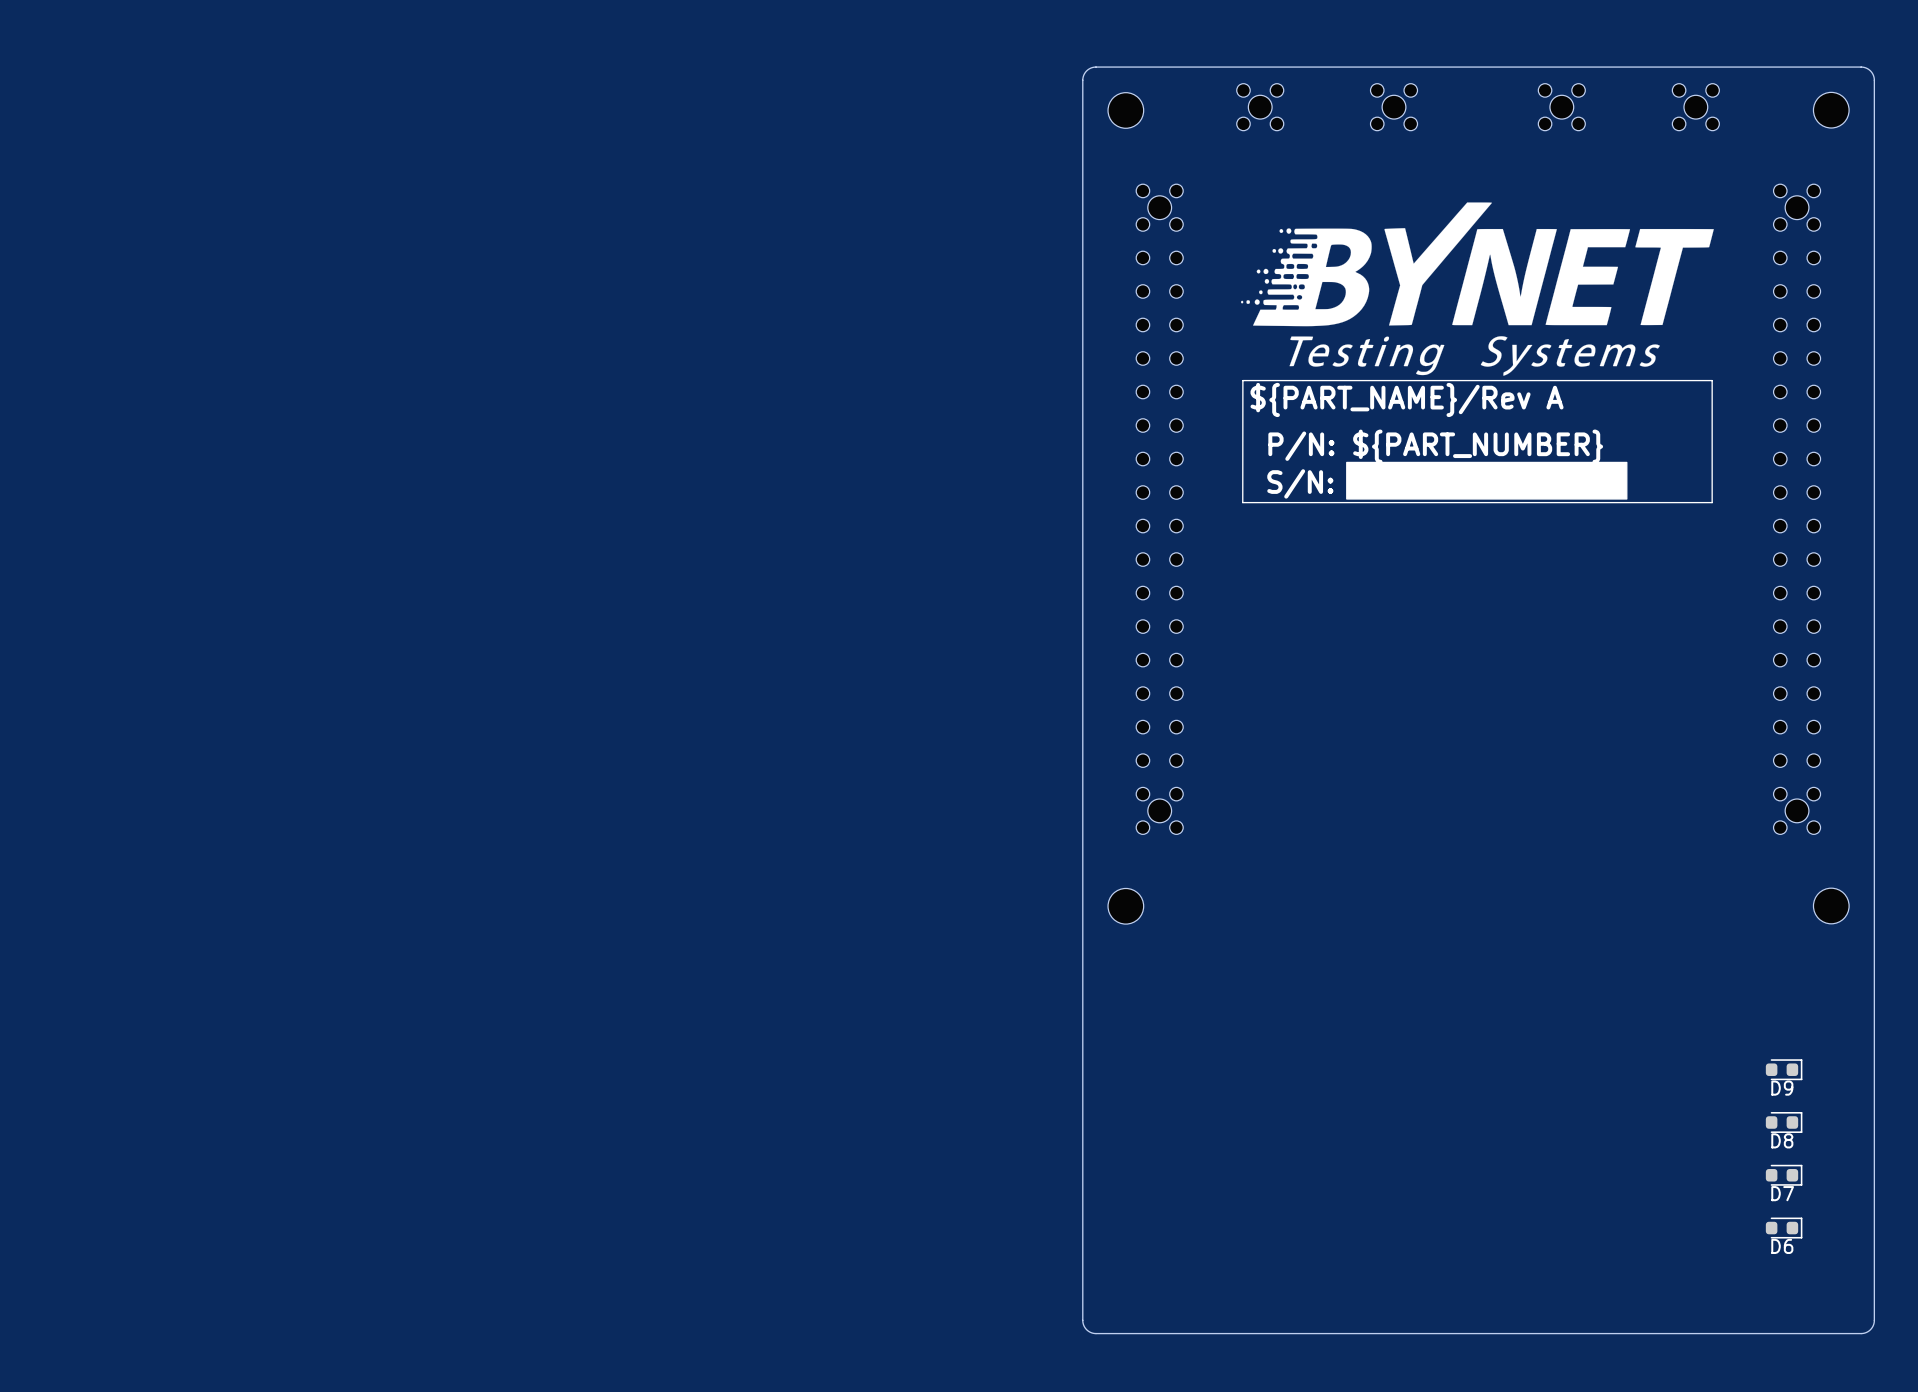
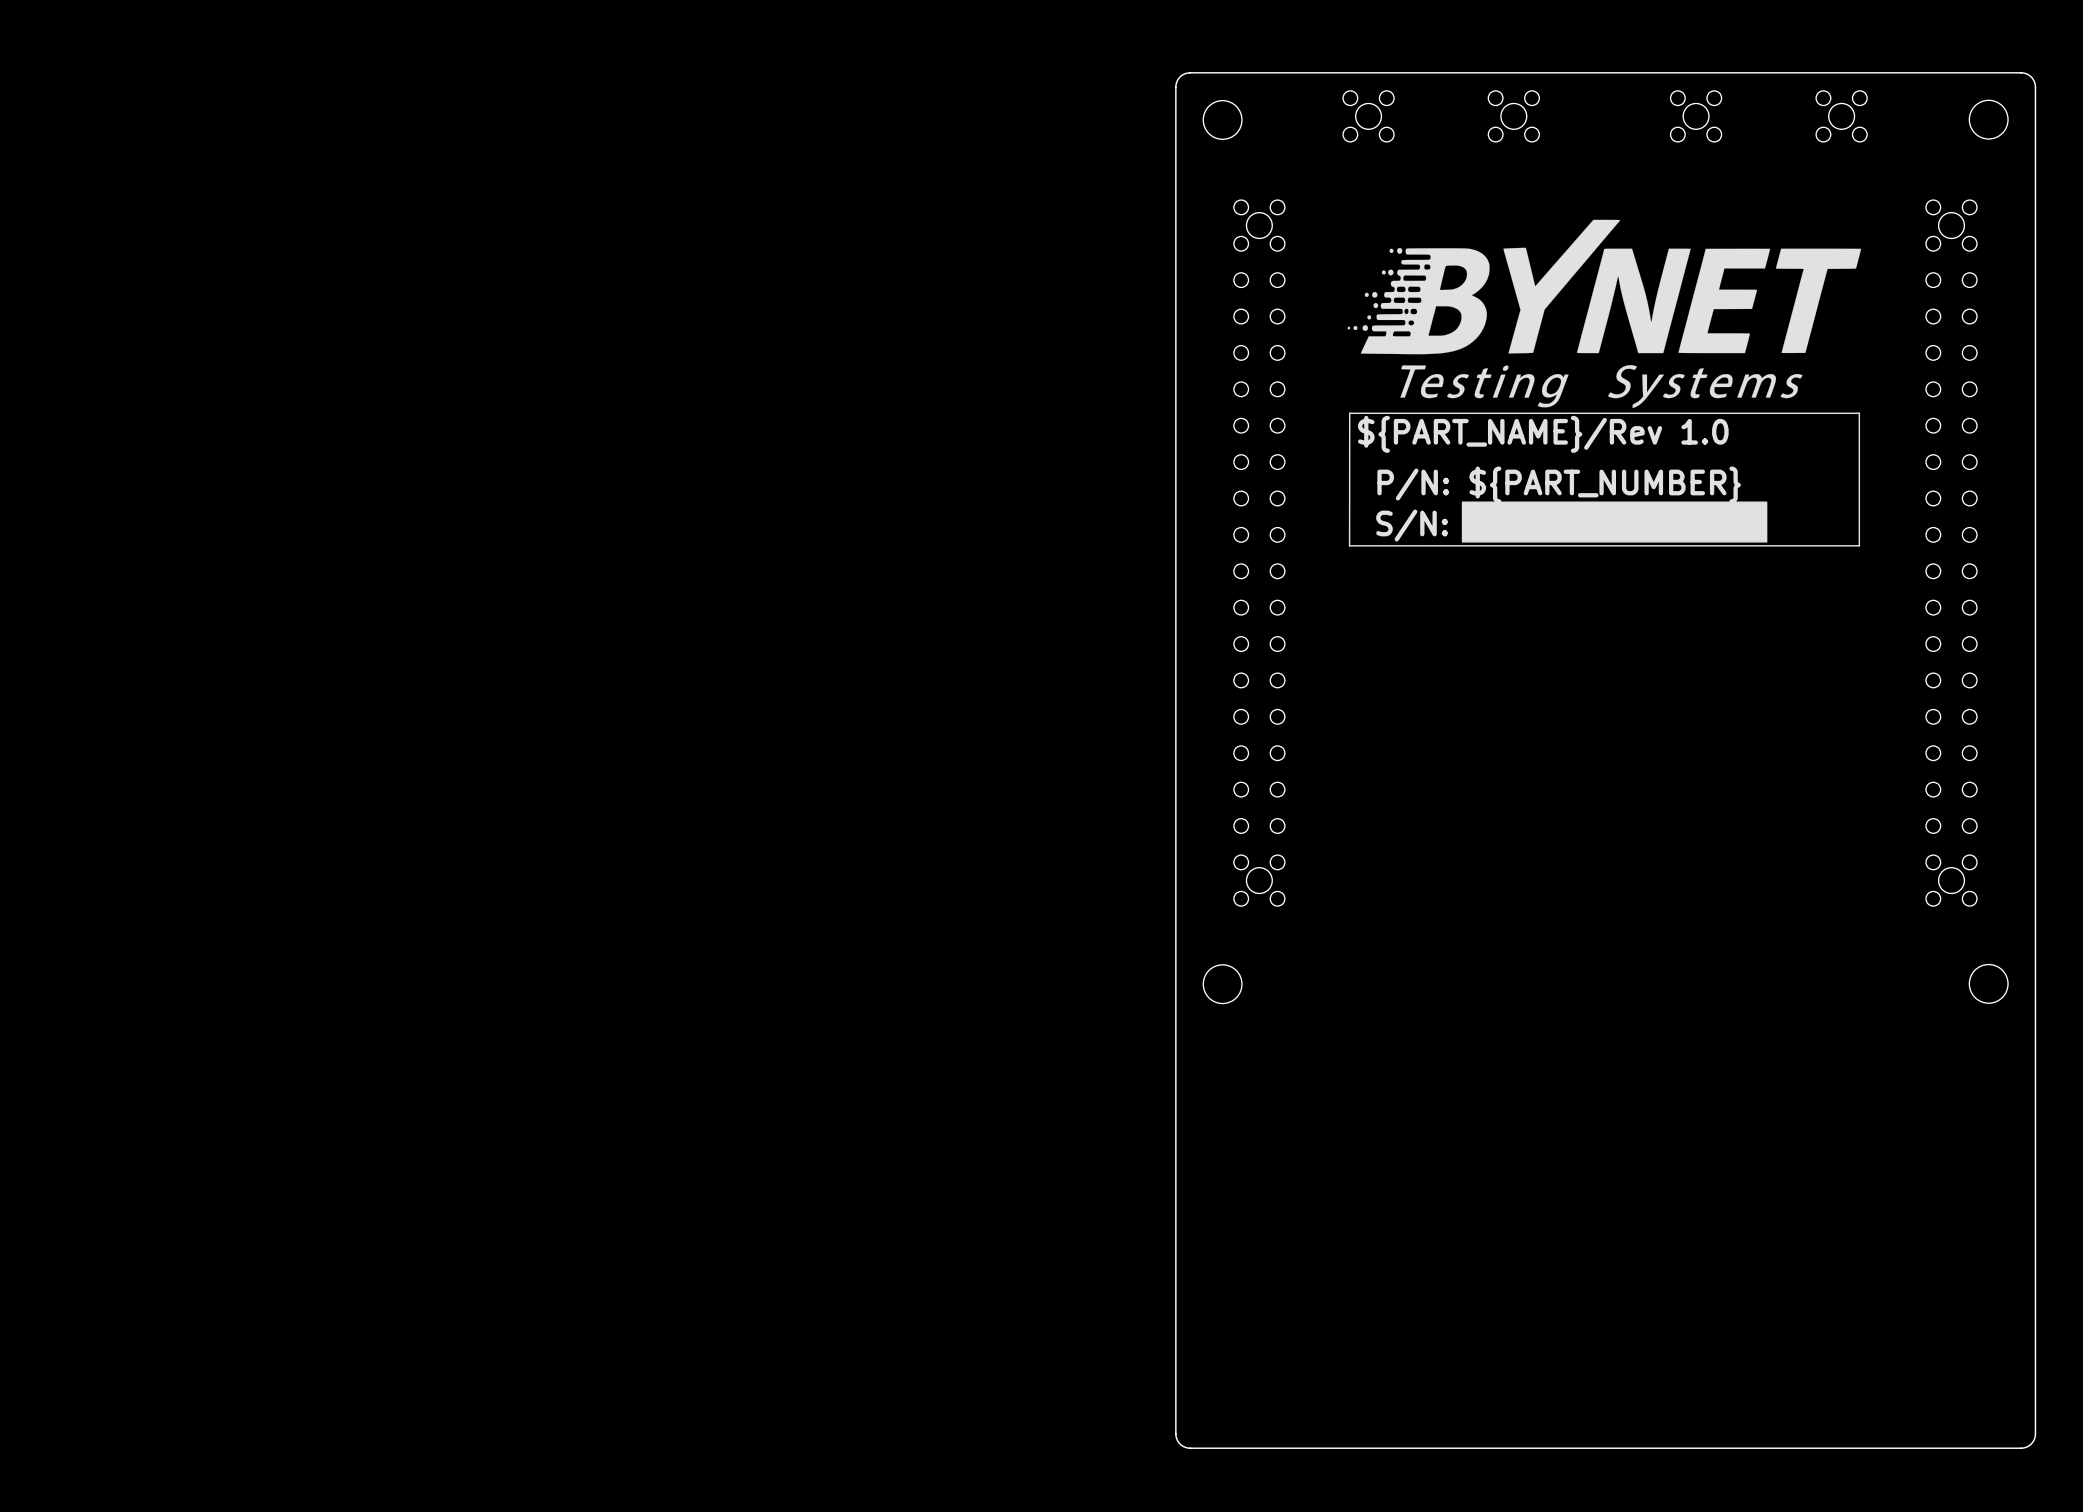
text: ${PART_NAME}/Rev A (1407, 399) -> ${PART_NAME}/Rev 1.0 (1543, 434)
D9: (1784, 1069) -> none
D8: (1784, 1122) -> none
D7: (1784, 1175) -> none
D6: (1784, 1228) -> none

